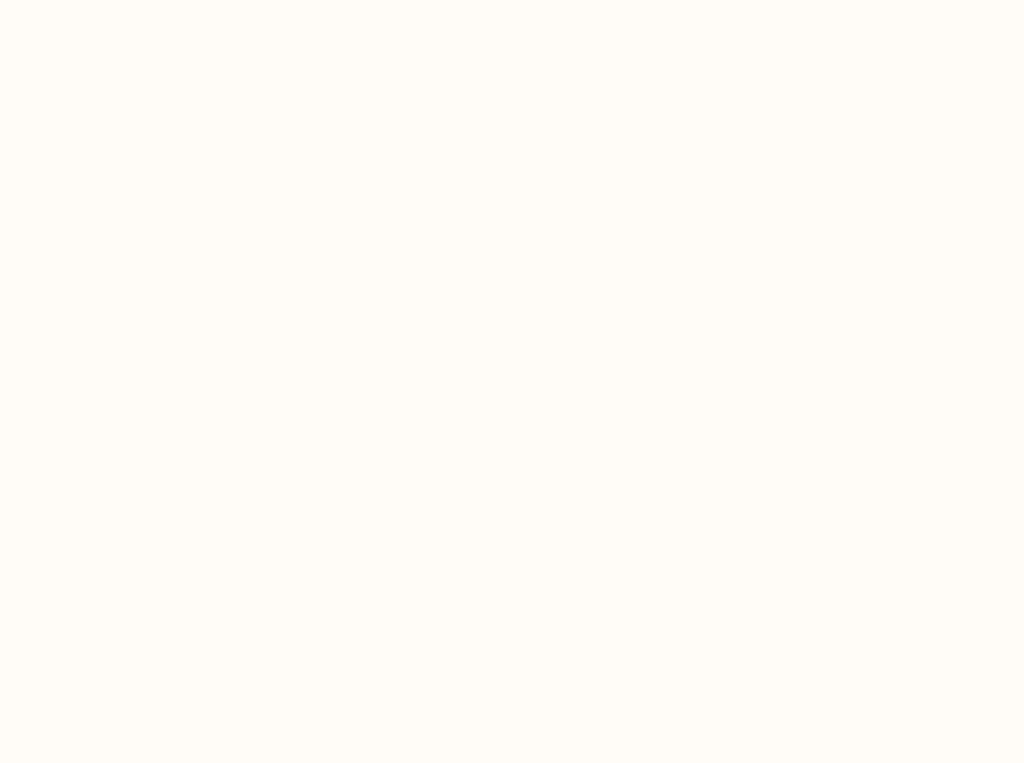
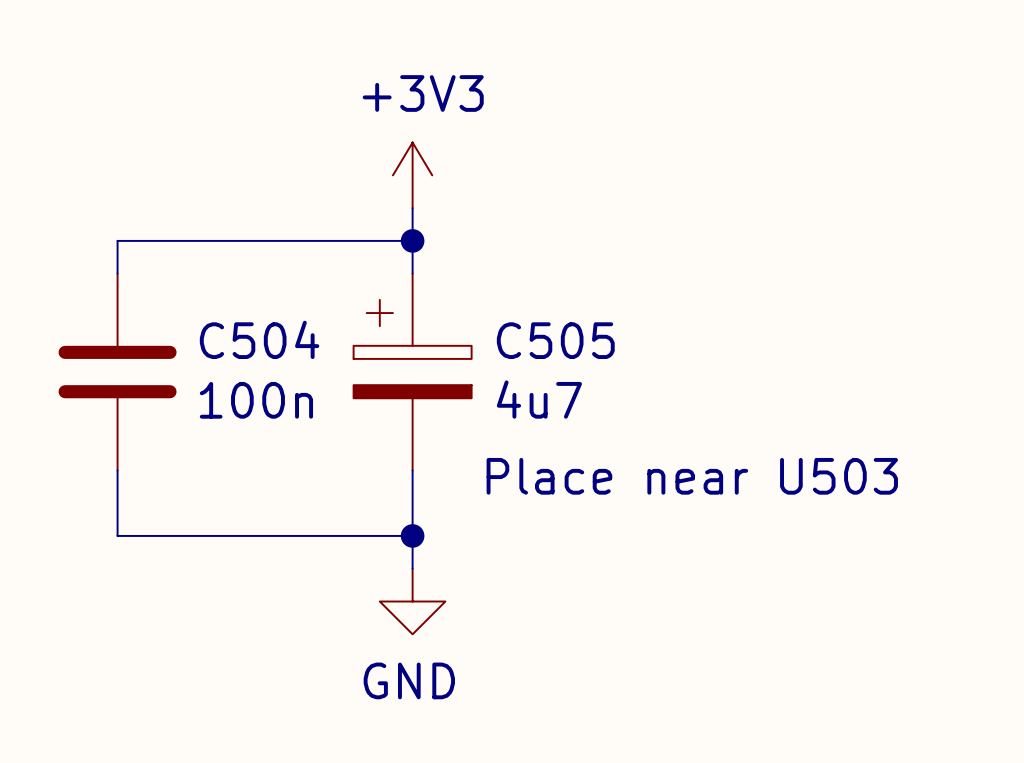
power symbol: none -> +3V3 (412, 175)
wire: none -> (412, 208) (412, 273)
wire: none -> (412, 240) (117, 240) (117, 273)
junction: none -> (412, 240)
C504: none -> 100n (117, 372)
C505: none -> 4u7 (412, 372)
wire: none -> (117, 470) (117, 535) (412, 535)
wire: none -> (412, 470) (412, 568)
text: none -> Place near U503 (692, 476)
junction: none -> (412, 535)
power symbol: none -> GND (412, 601)

